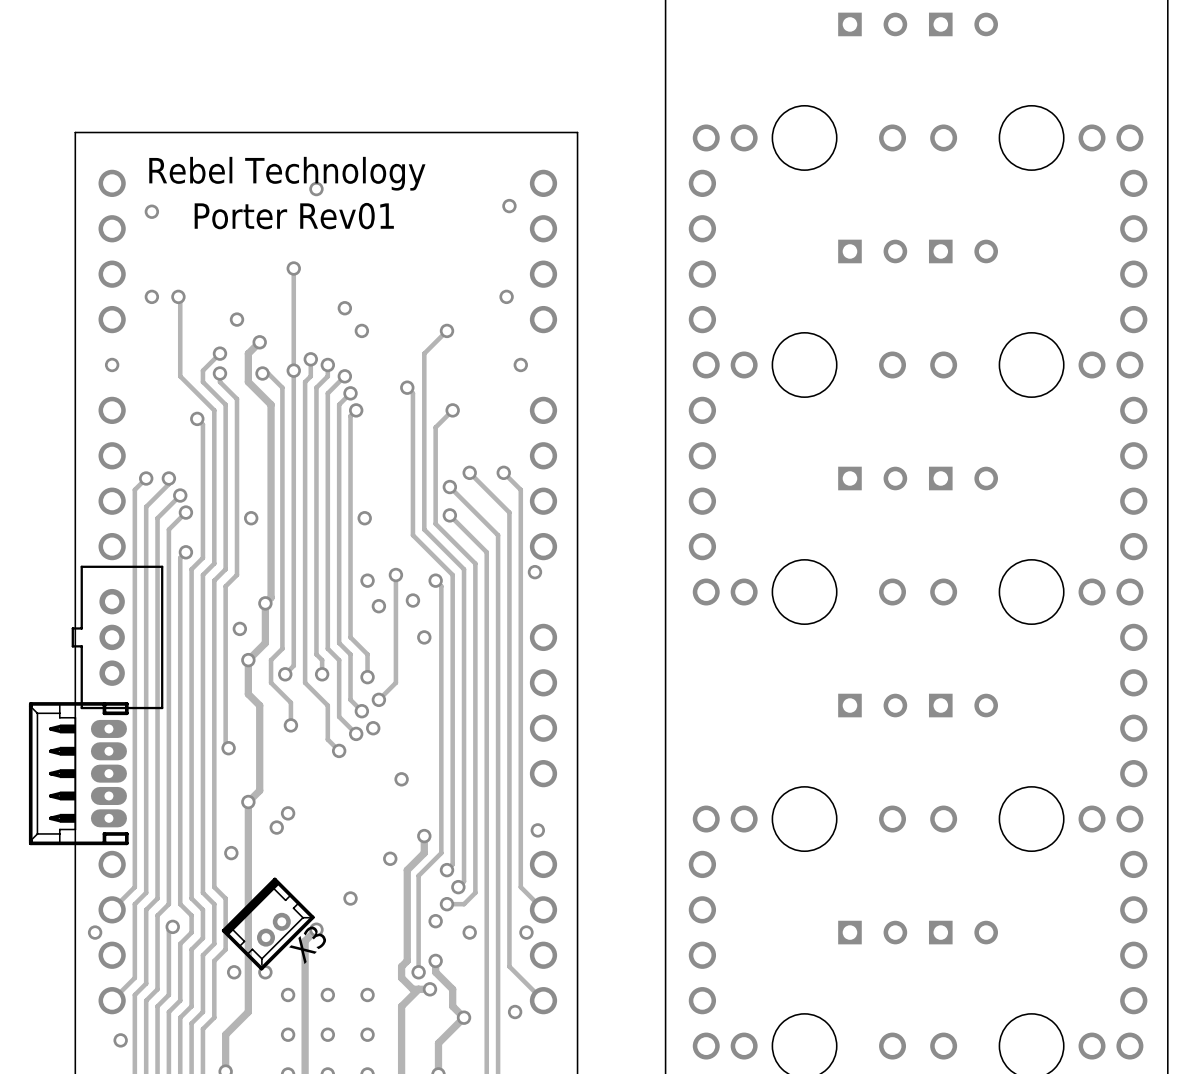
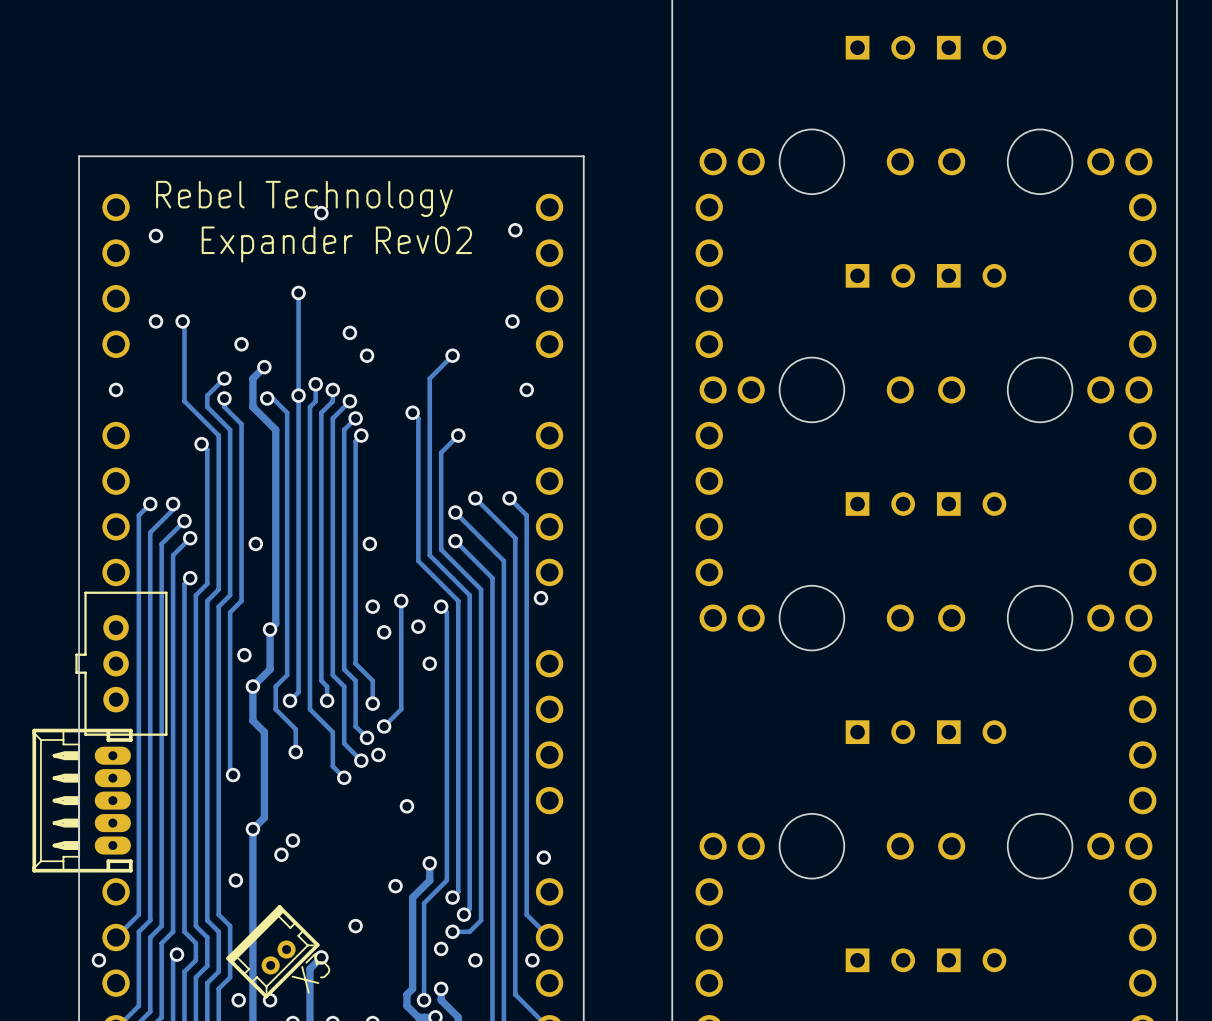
text: Porter Rev01 (294, 216) -> Expander Rev02 (336, 244)

